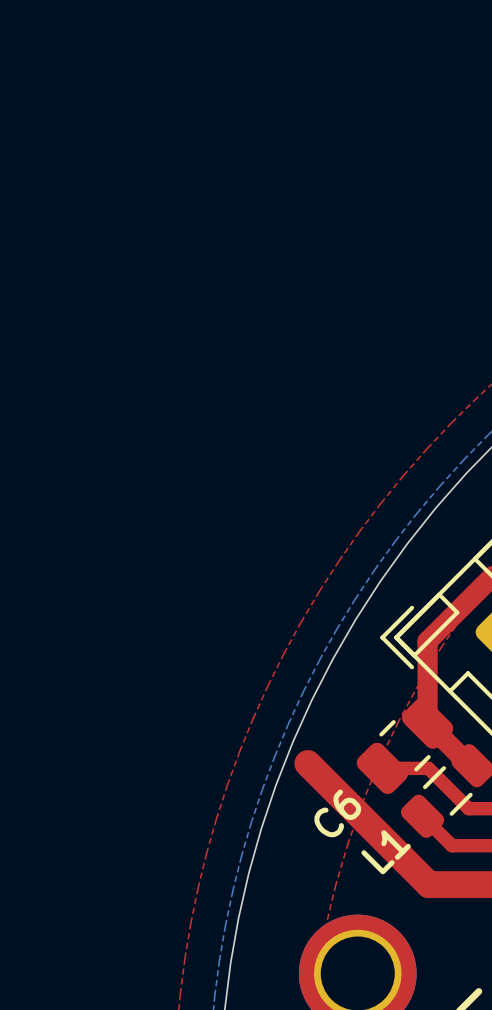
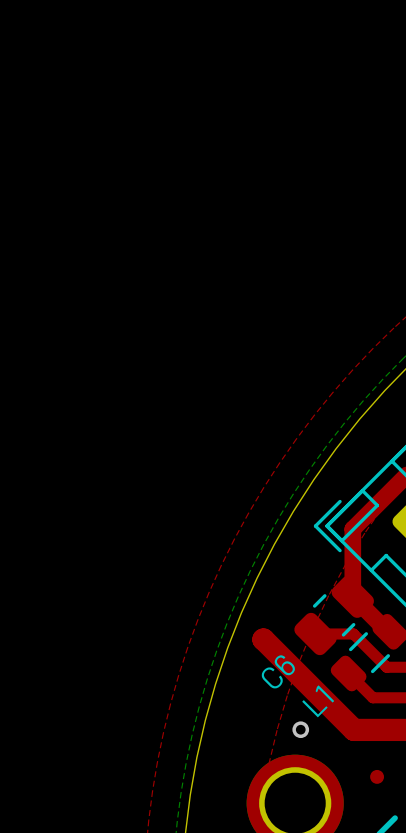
top track: (307, 763) (319, 775) -> none
via: none -> (300, 729)
part: none -> (377, 776)

